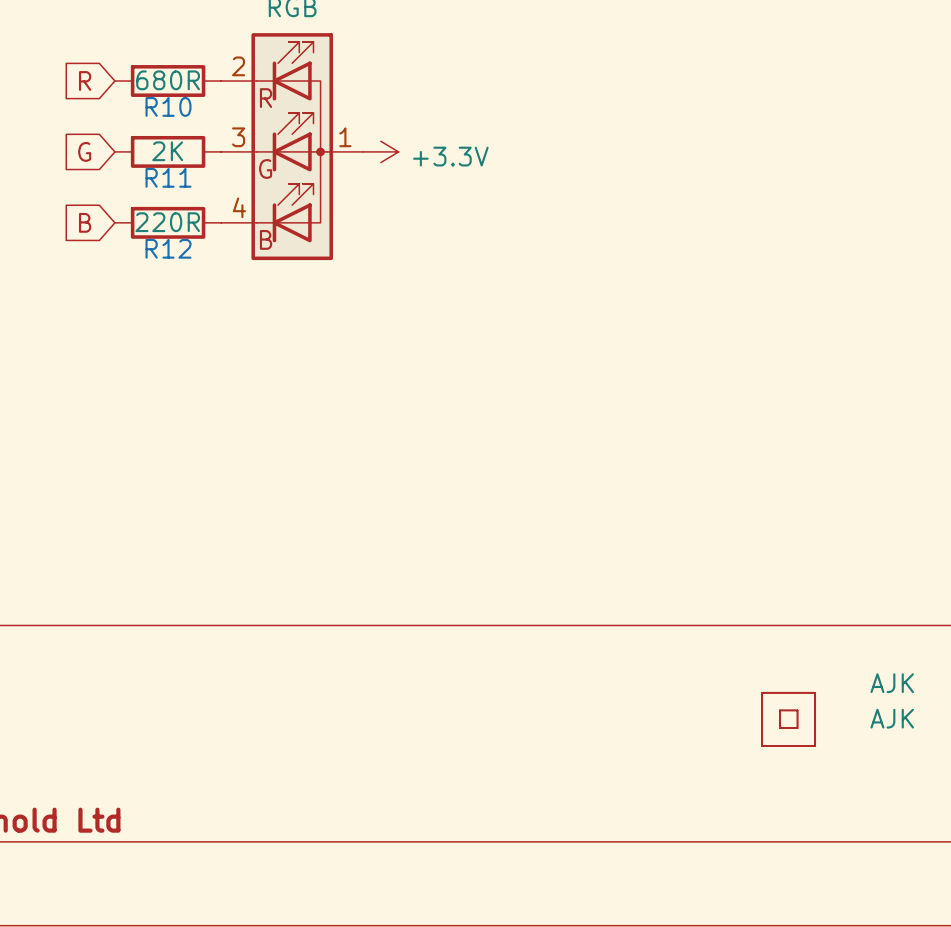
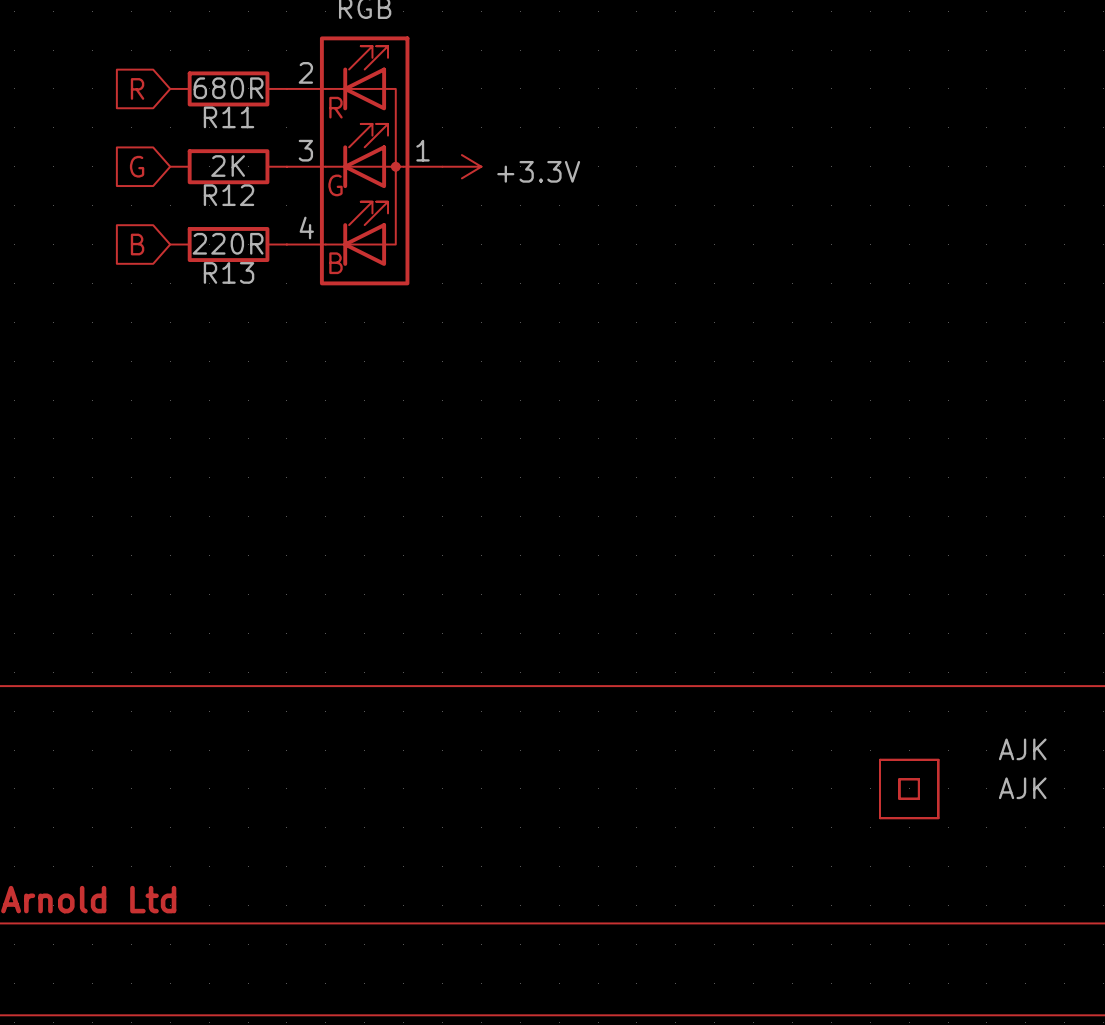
R10 name: R10 (168, 106) -> R11 (229, 117)
R11 name: R11 (168, 177) -> R12 (229, 195)
R12 name: R12 (168, 248) -> R13 (229, 272)

